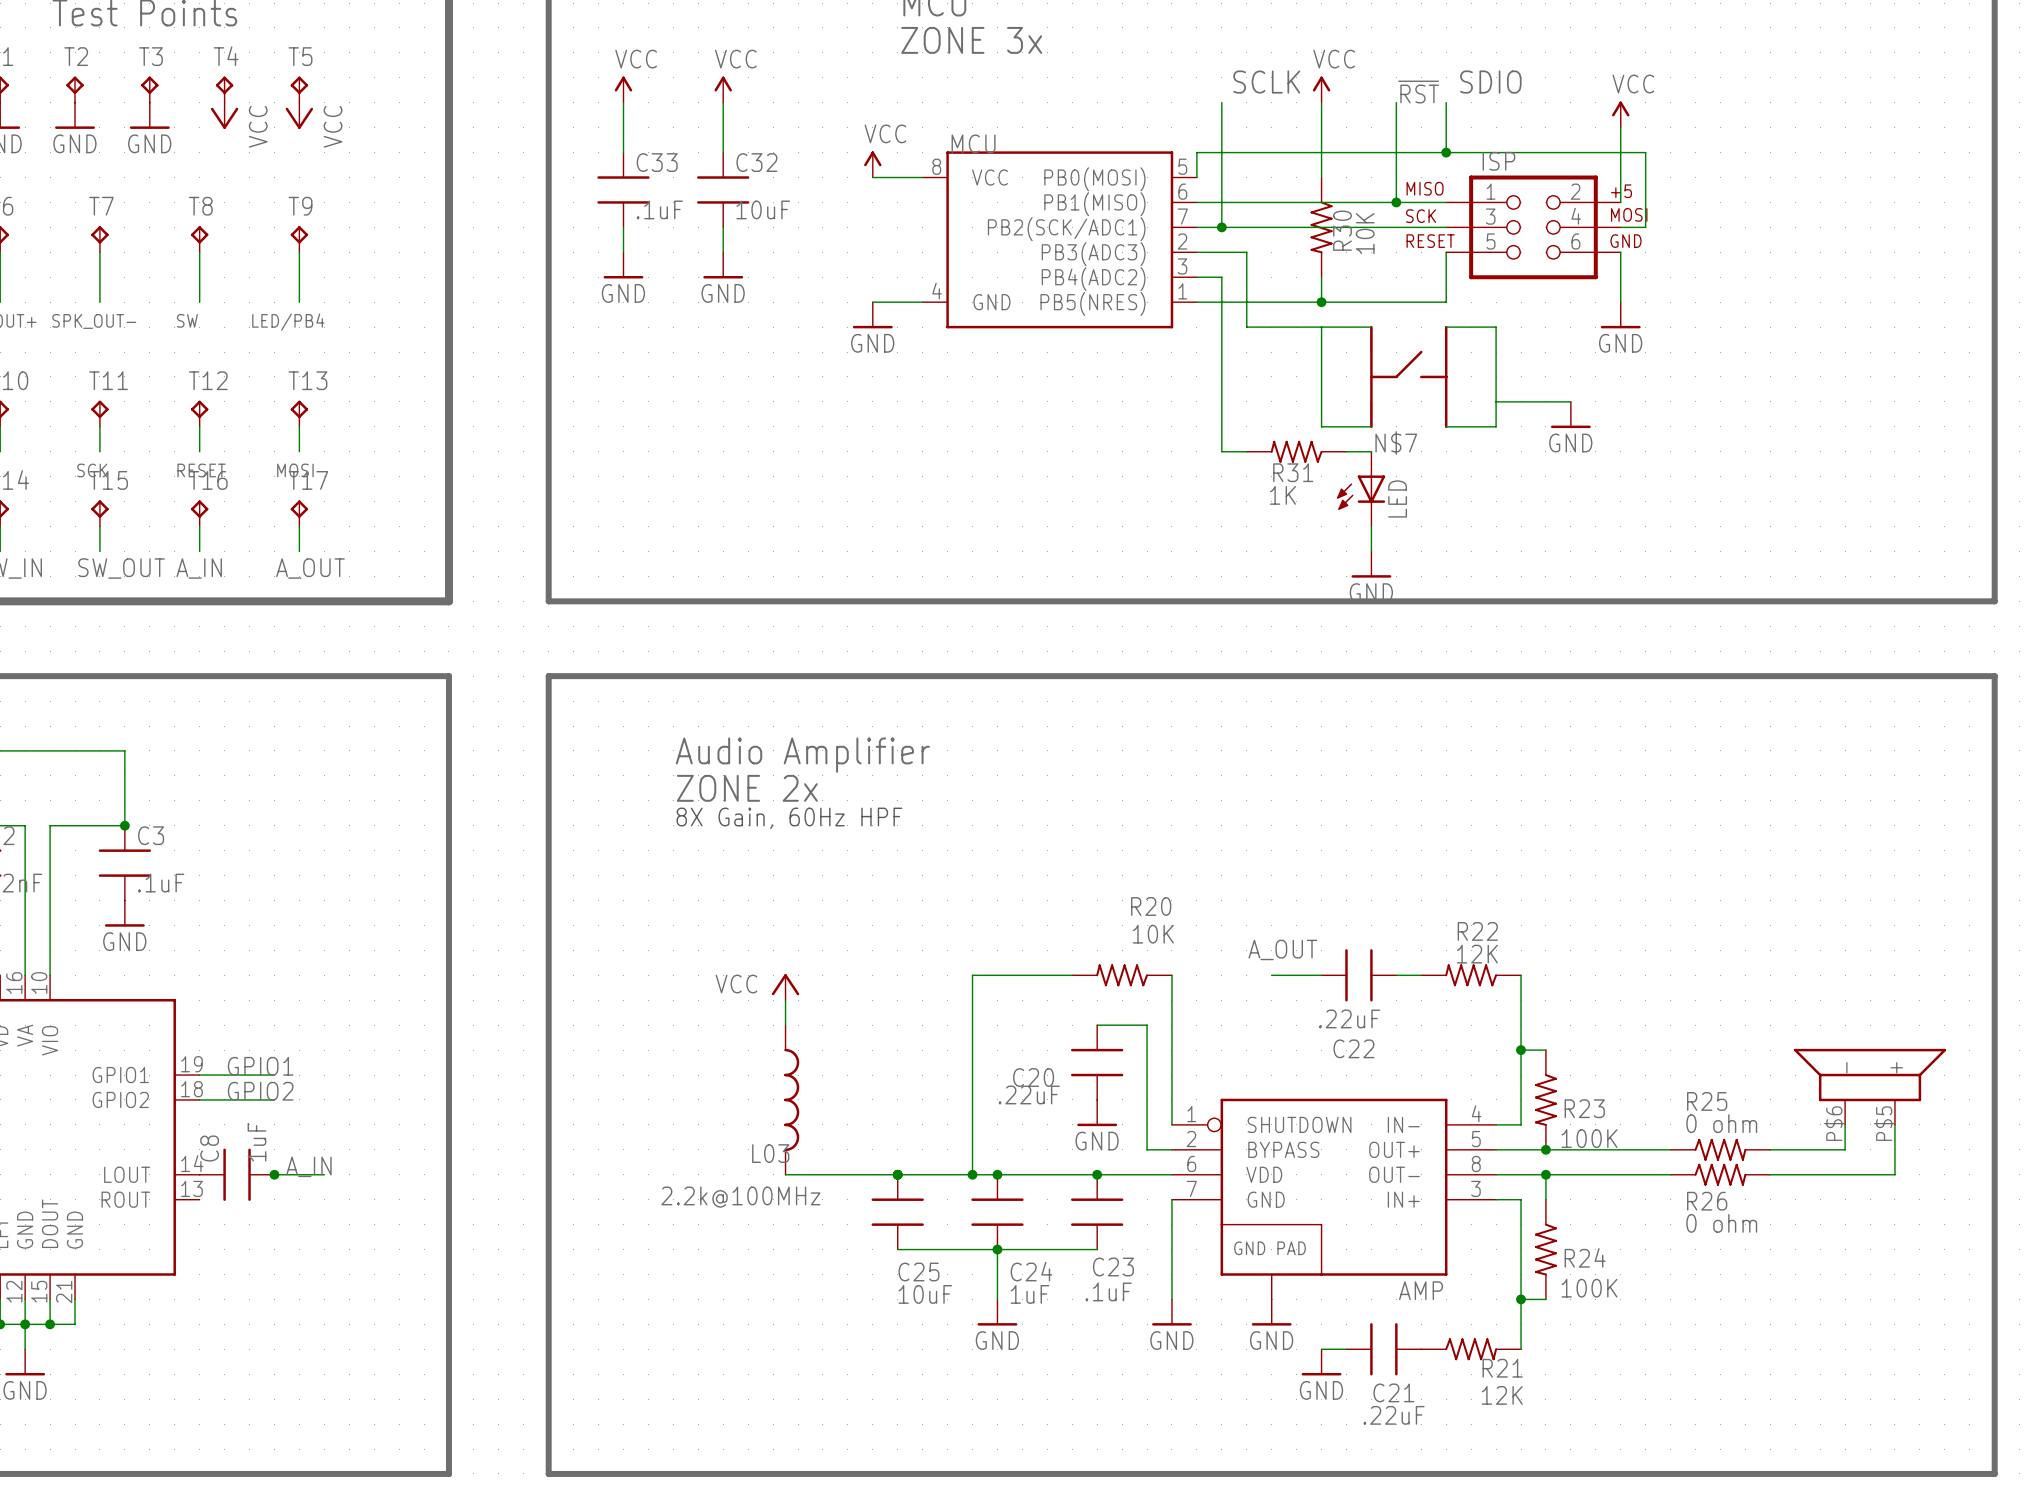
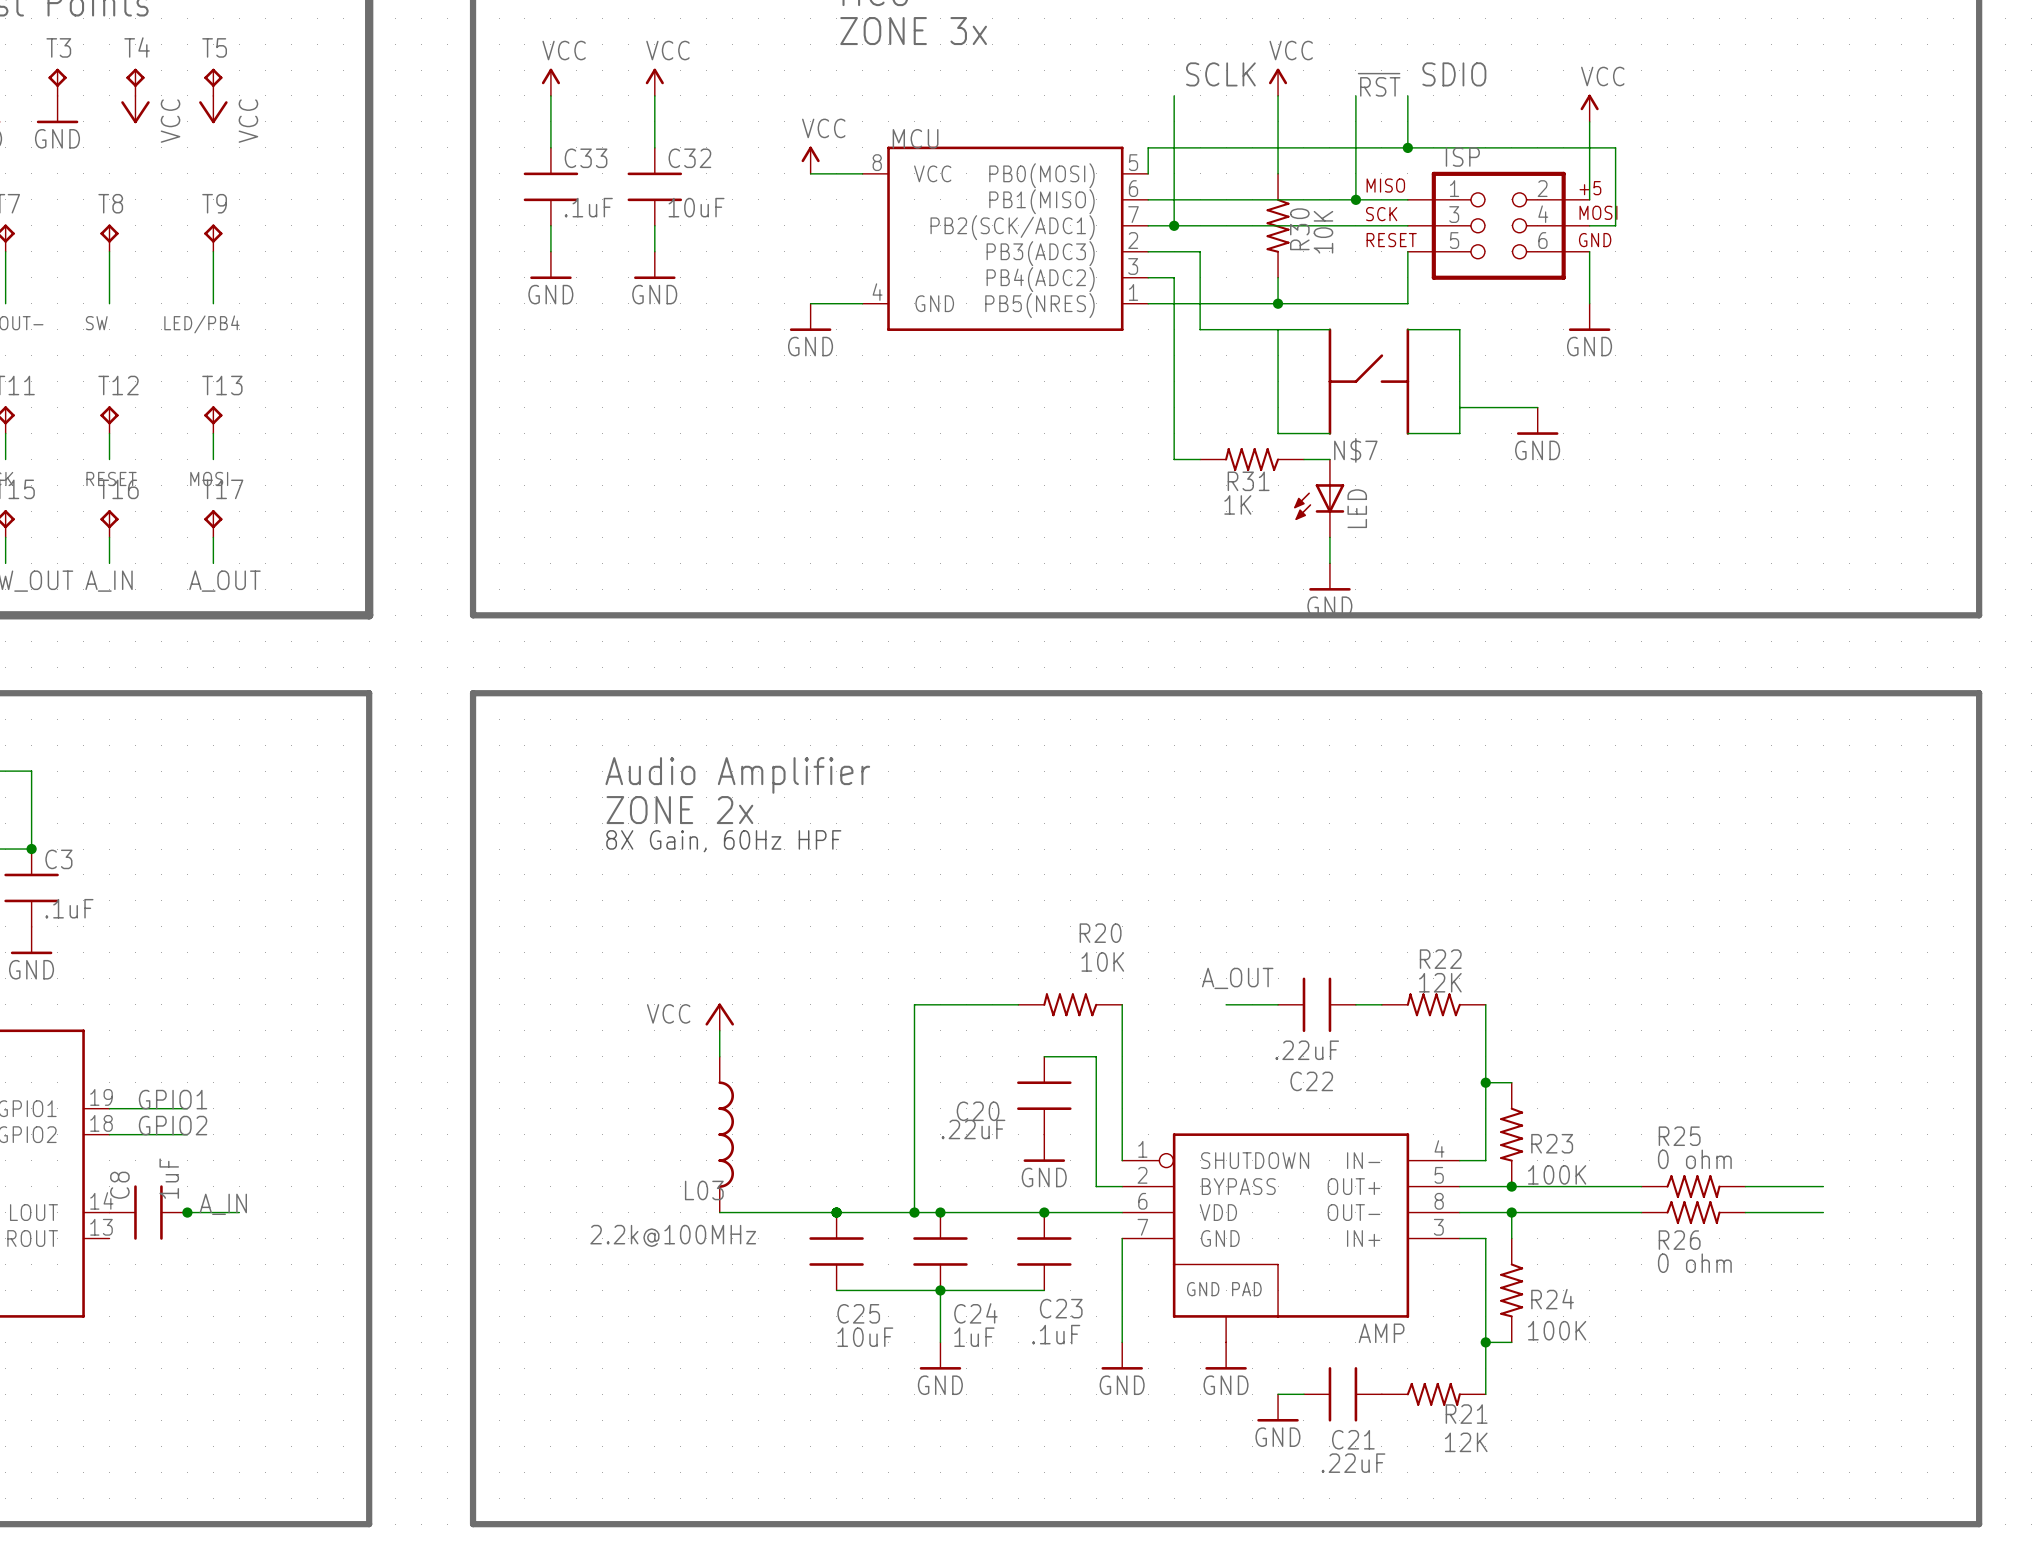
part: (1870, 1086) -> none
wire: (1845, 1124) (1845, 1149) -> none
wire: (1894, 1124) (1894, 1174) (1845, 1174) -> none

